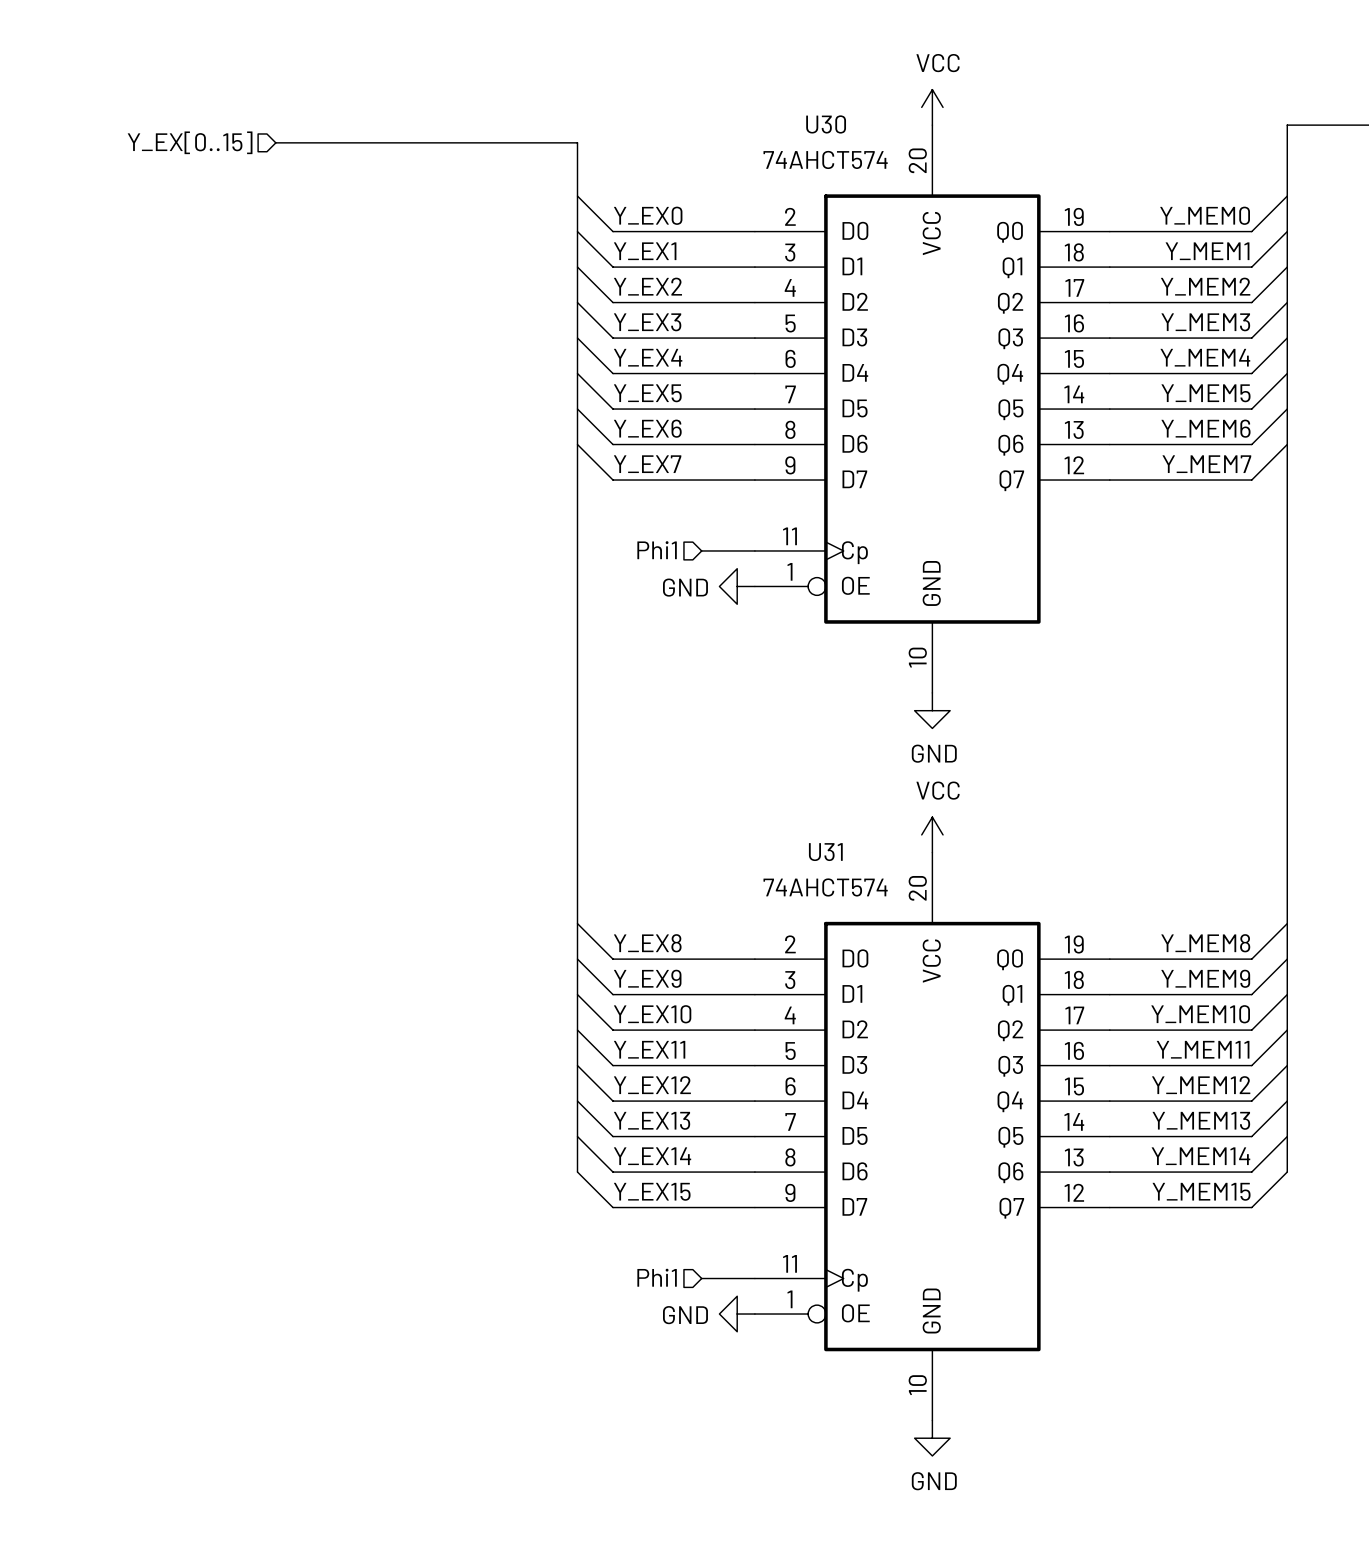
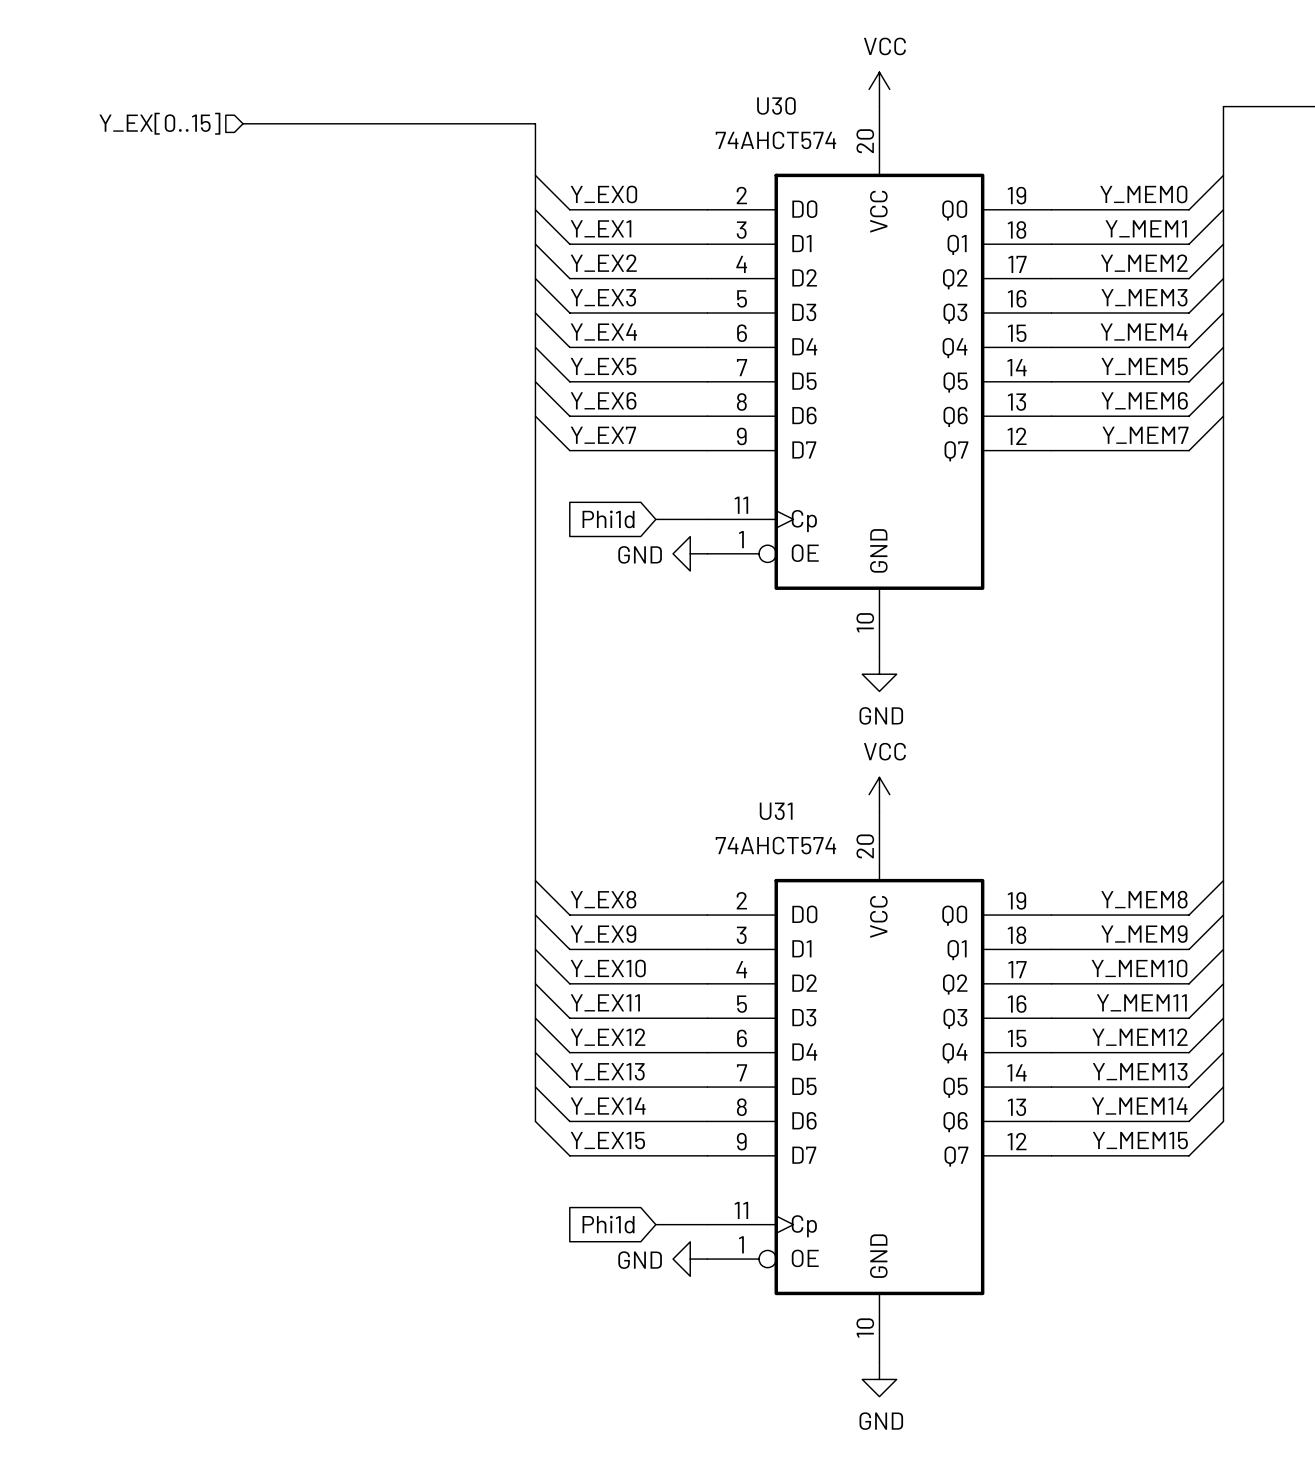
global label: none -> Phi1d (608, 519)
hierarchical label: Phi1 (657, 550) -> none
hierarchical label: Phi1 (657, 1277) -> none
global label: none -> Phi1d (608, 1224)

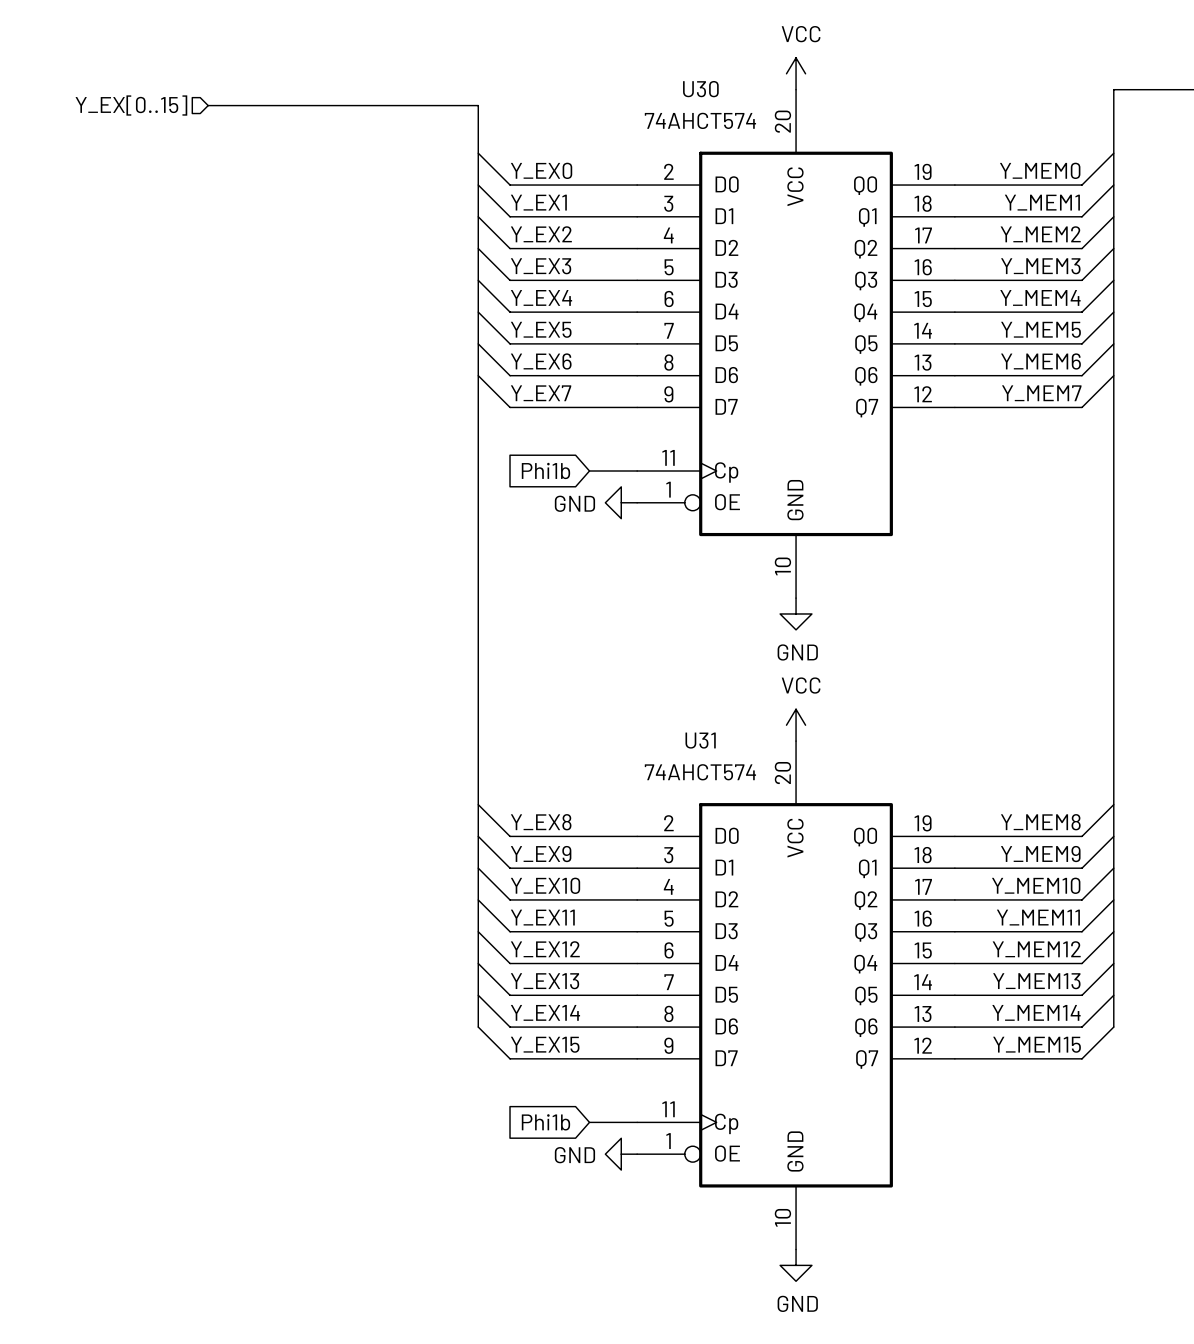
global label: Phi1d (608, 519) -> Phi1b (545, 470)
global label: Phi1d (608, 1224) -> Phi1b (545, 1122)

